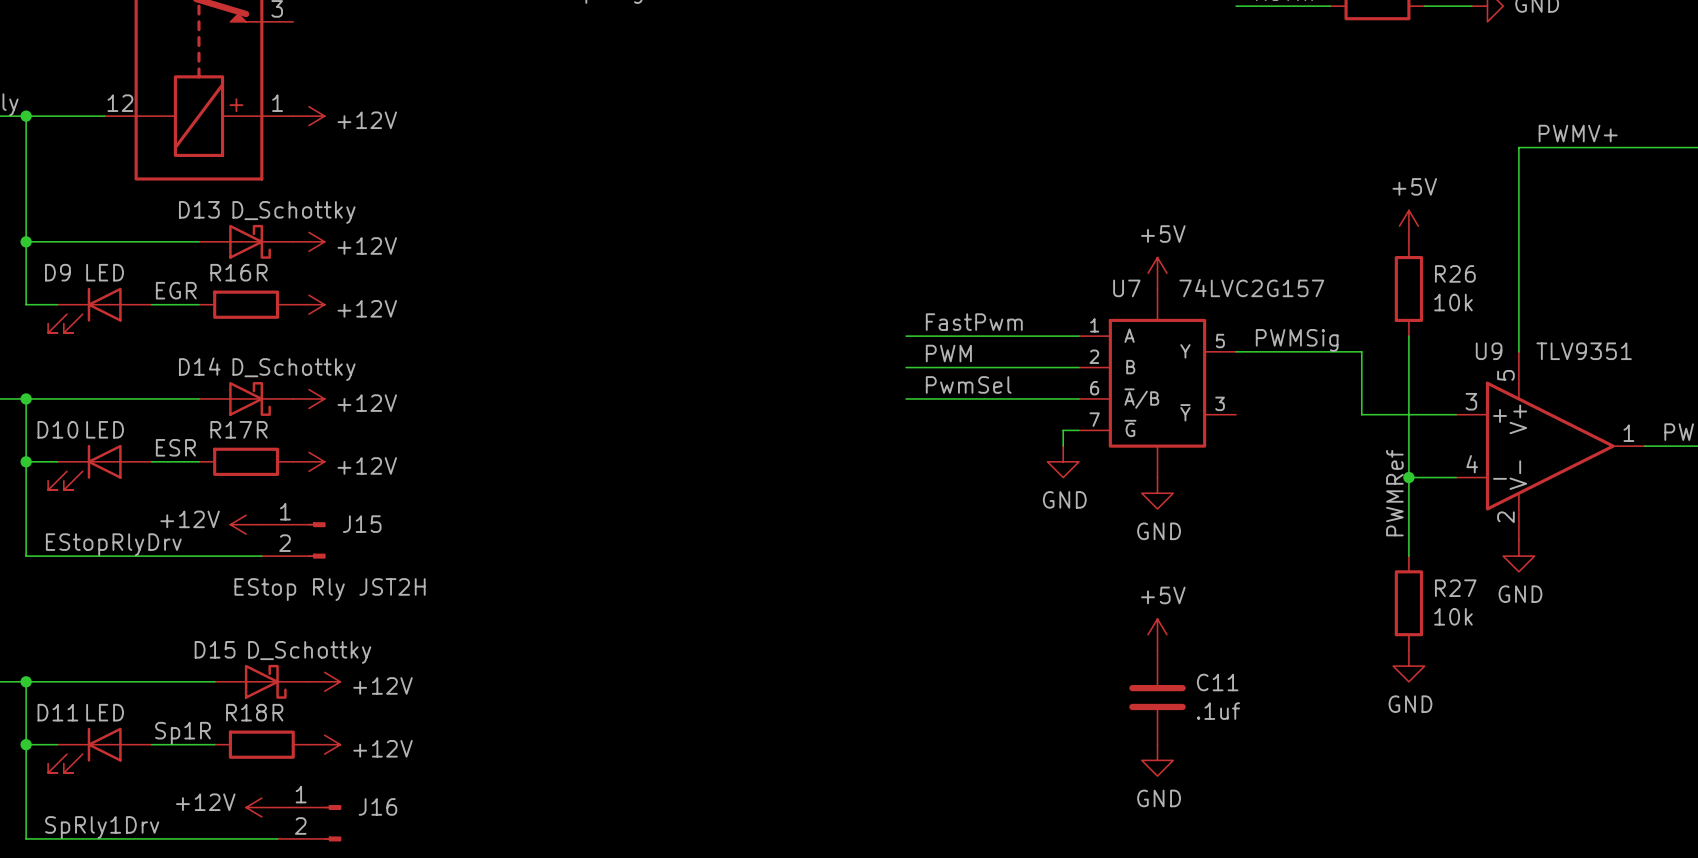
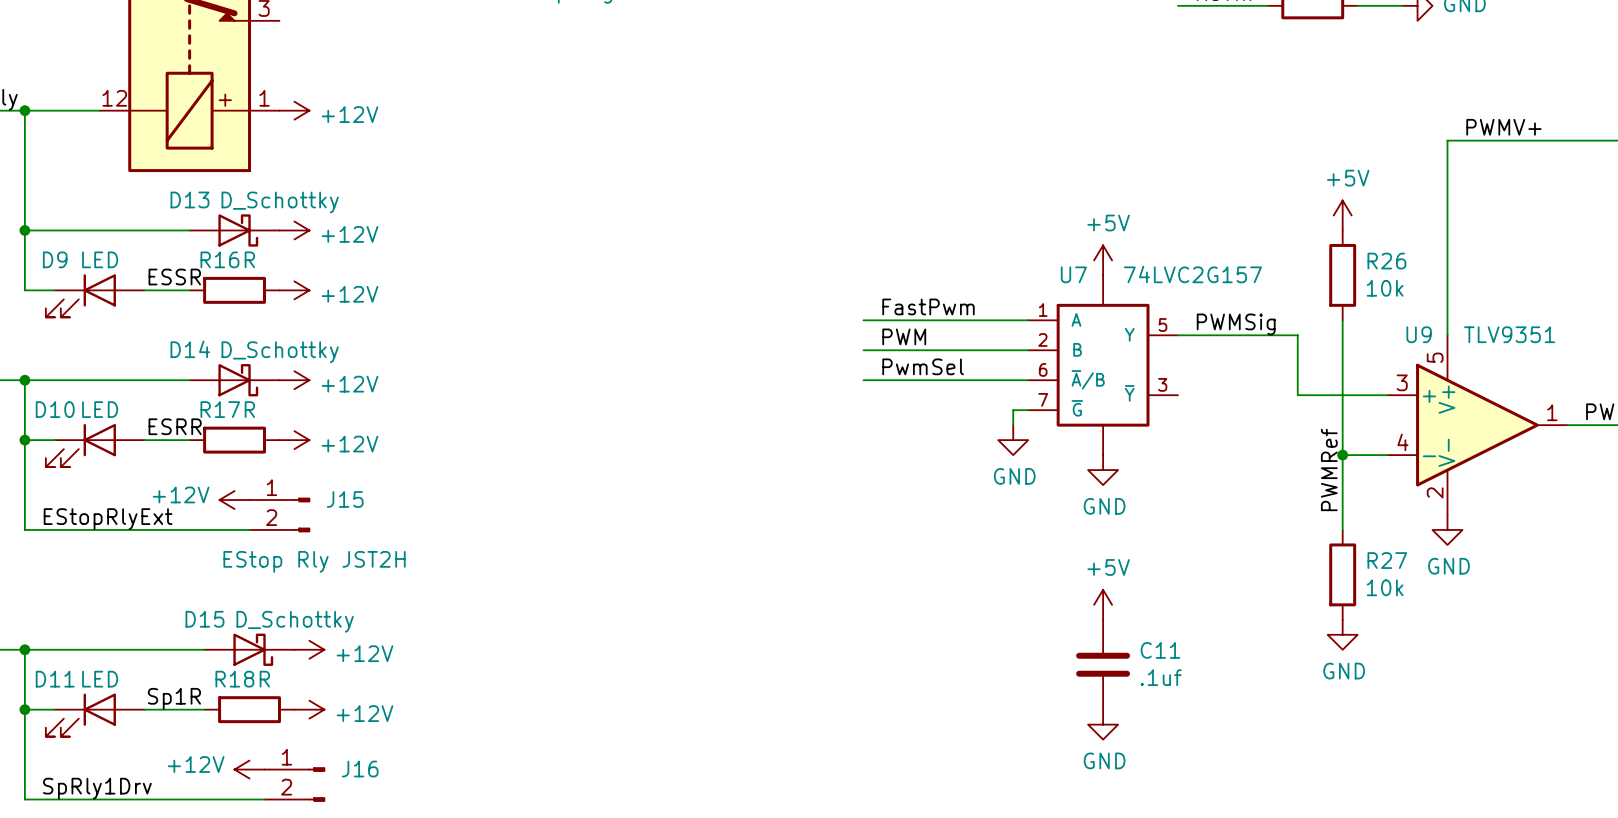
label: EGR (176, 290) -> ESSR (174, 277)
label: ESR (175, 447) -> ESRR (175, 426)
label: EStopRlyDrv (113, 544) -> EStopRlyExt (108, 519)

